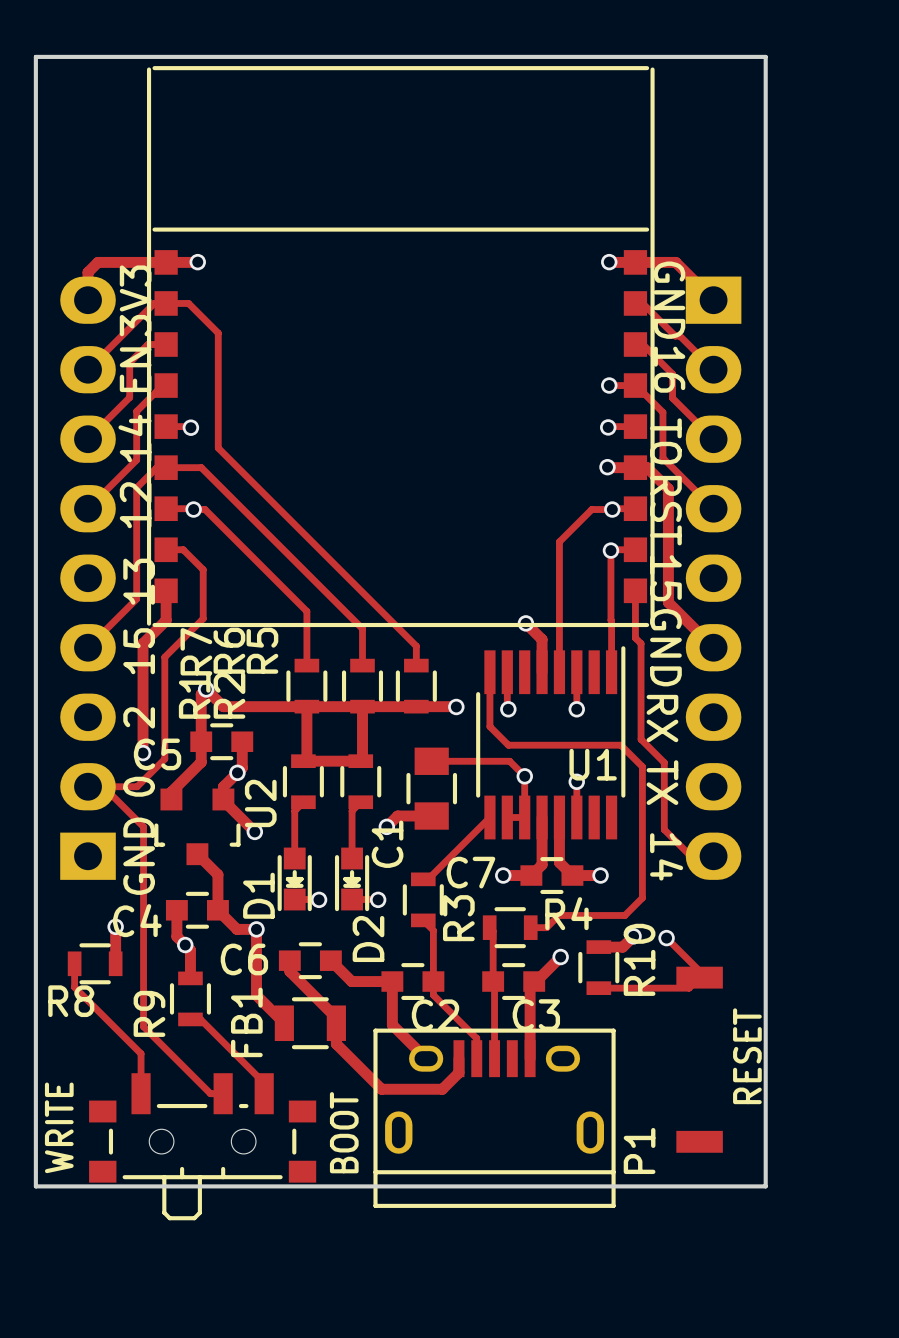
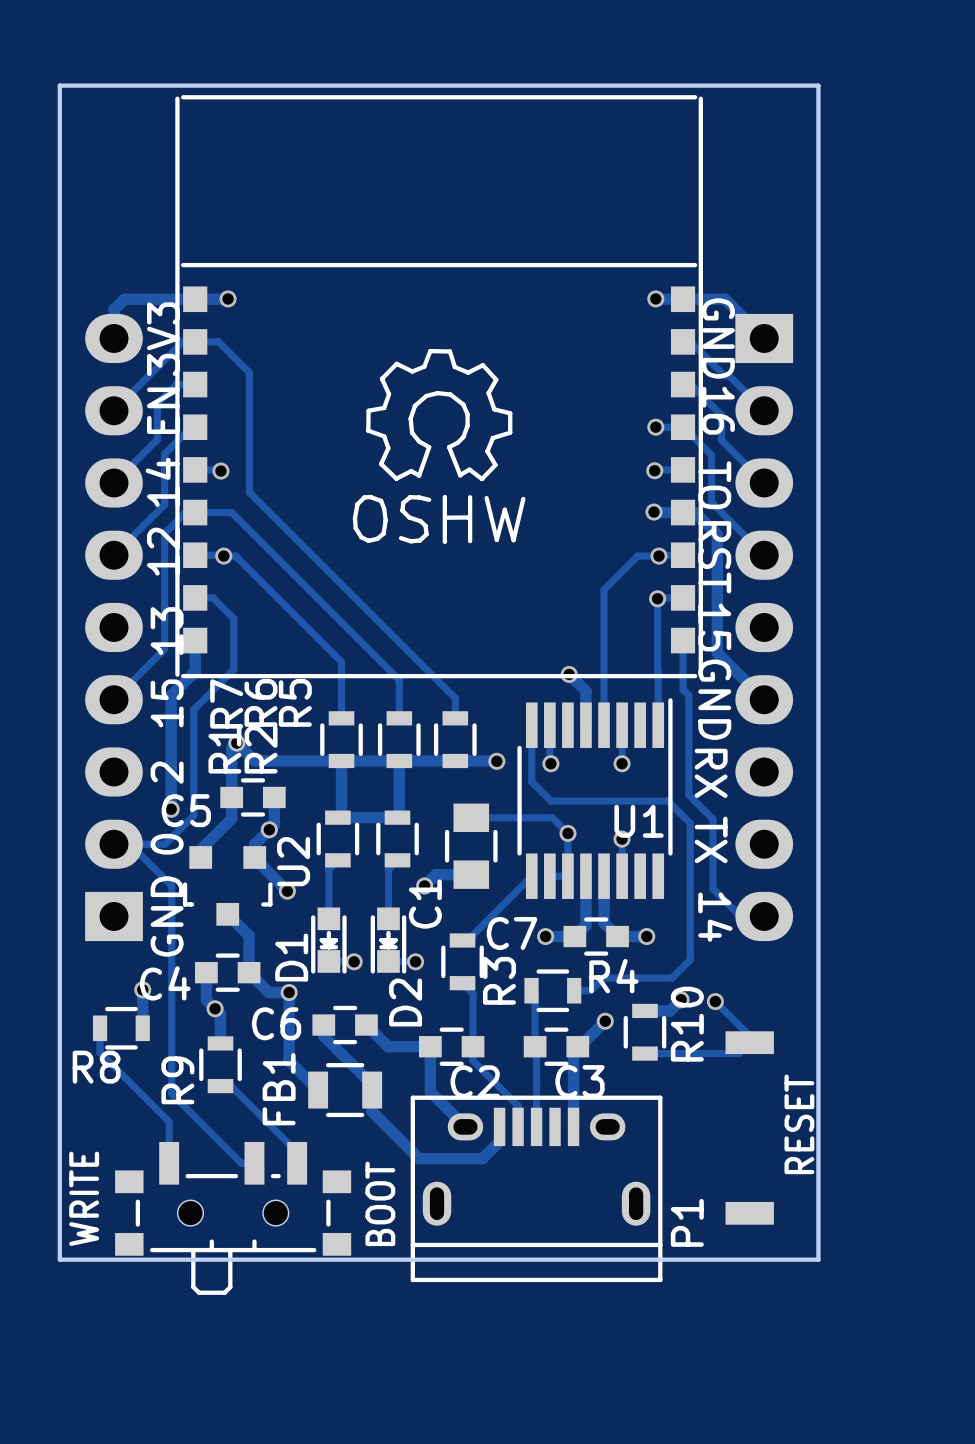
drawing: none -> [352, 348, 526, 544]

